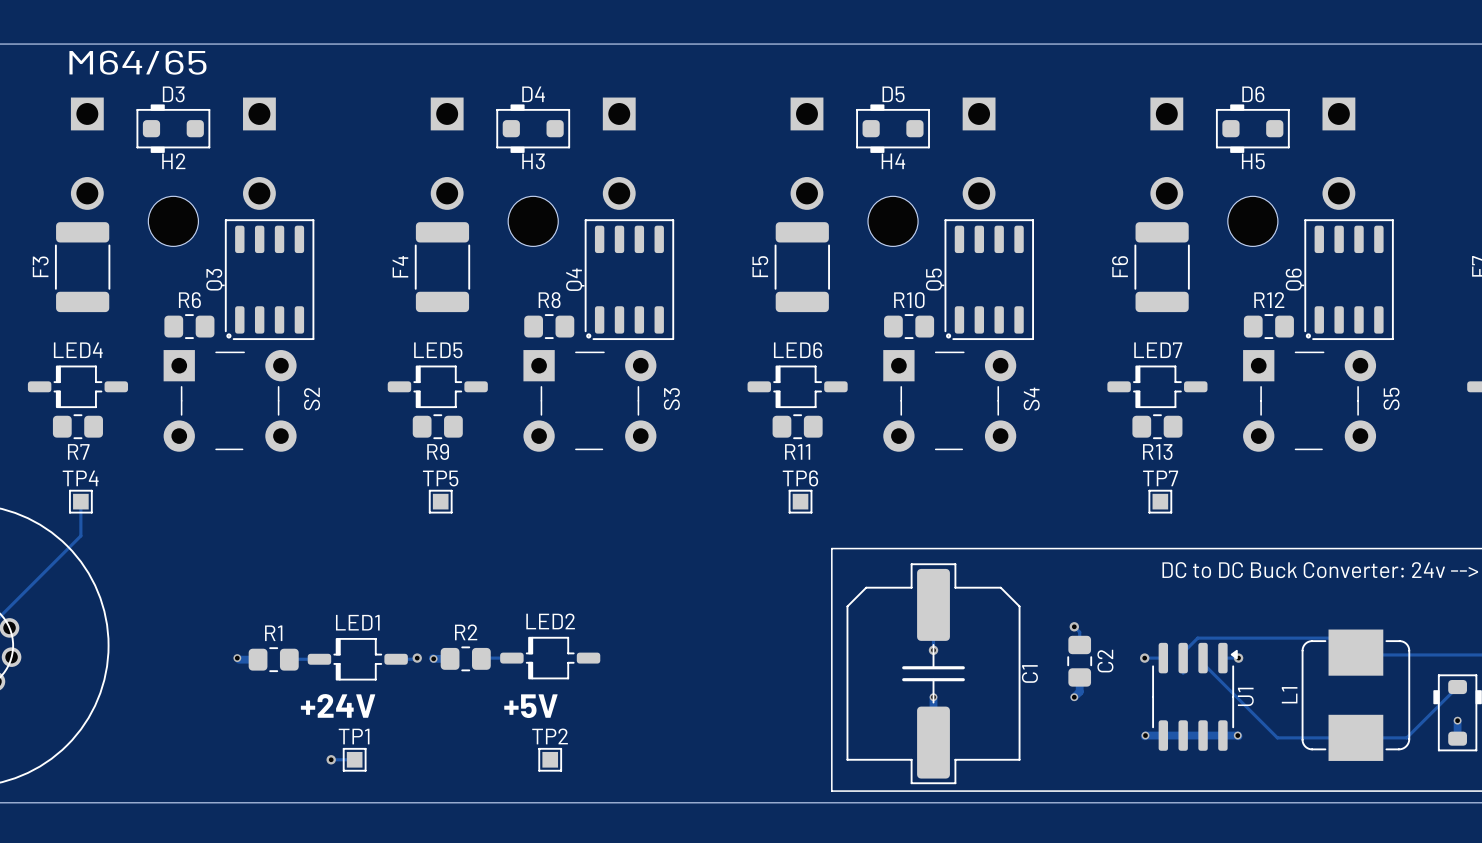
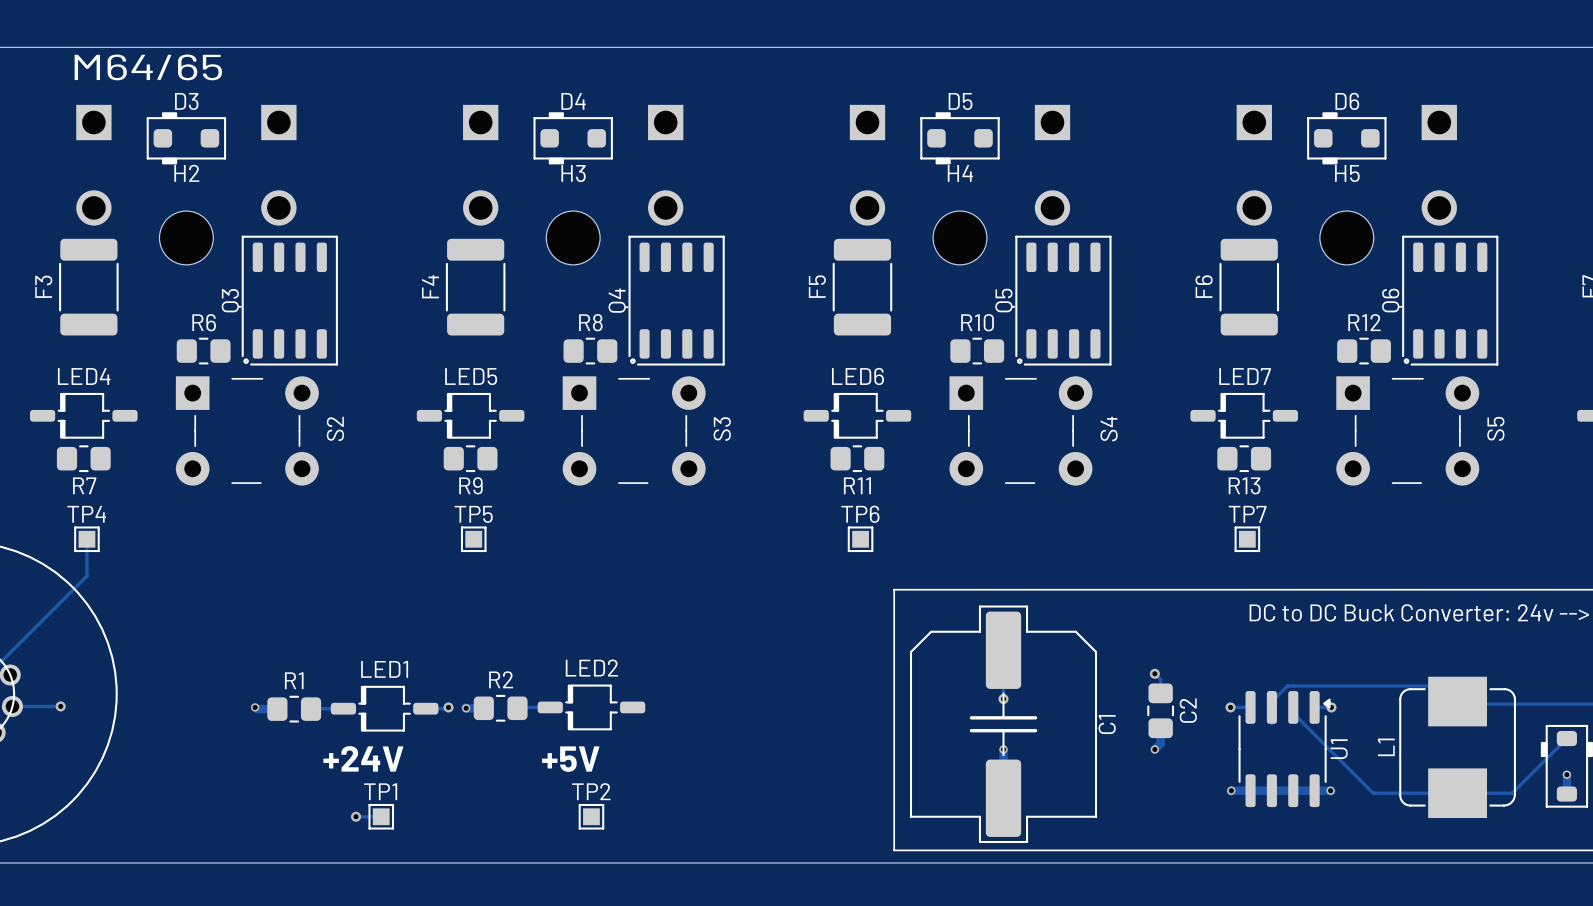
track: none -> (12, 706) (61, 707)
via: none -> (60, 706)

